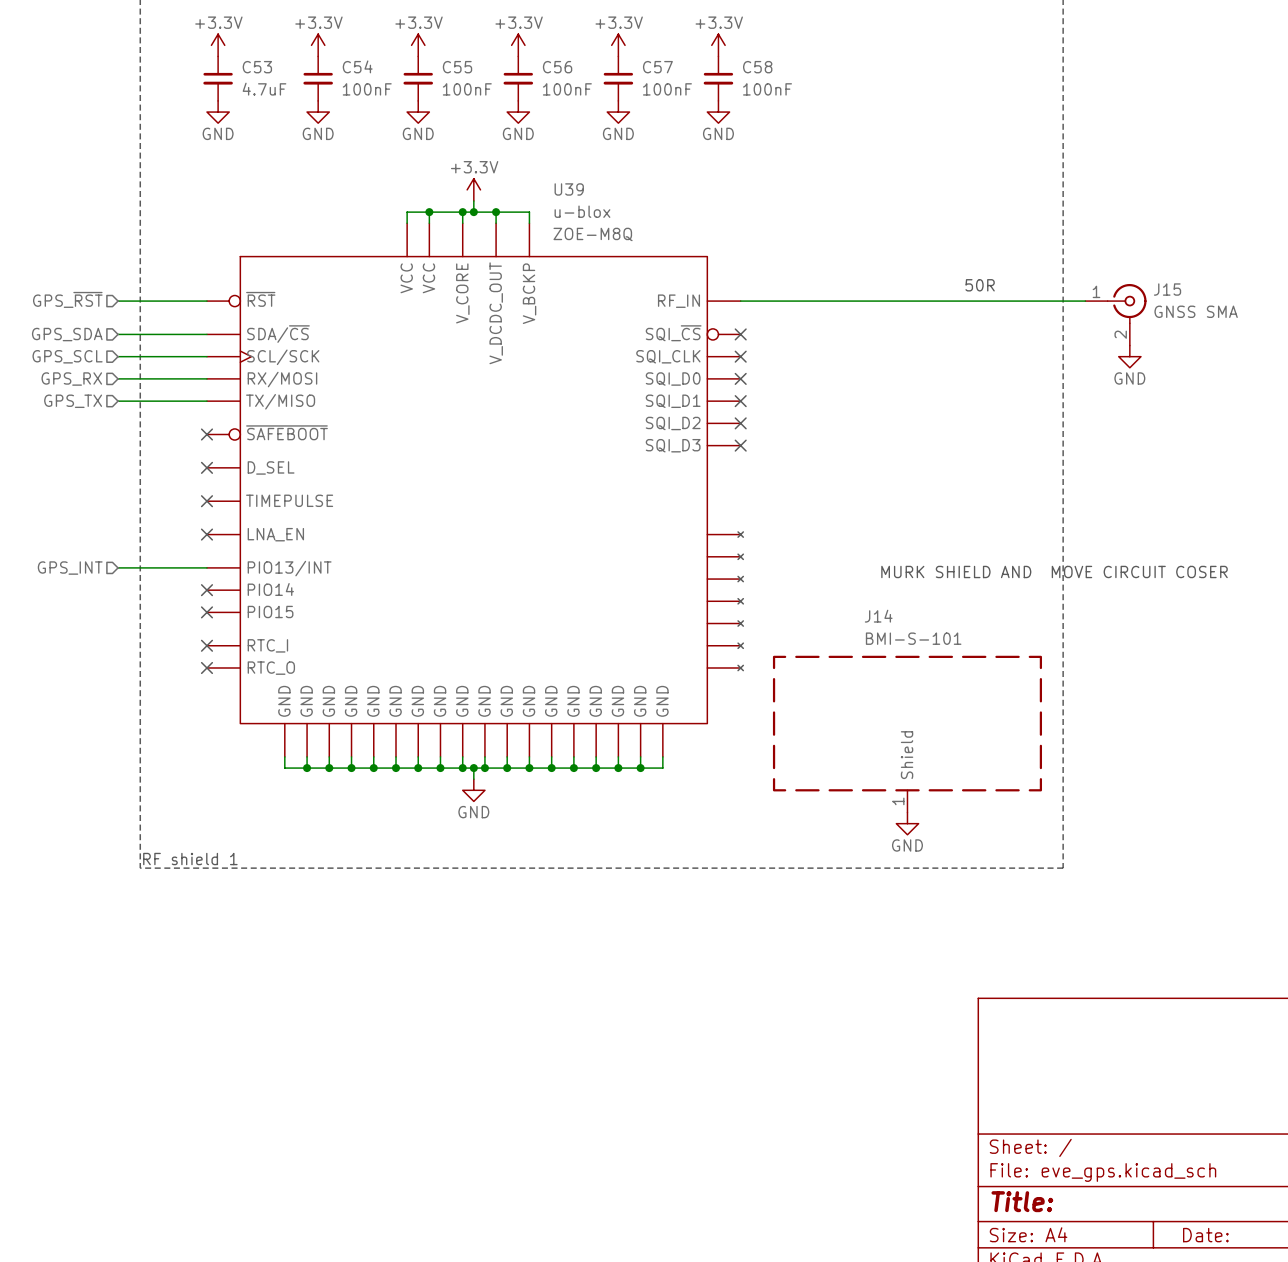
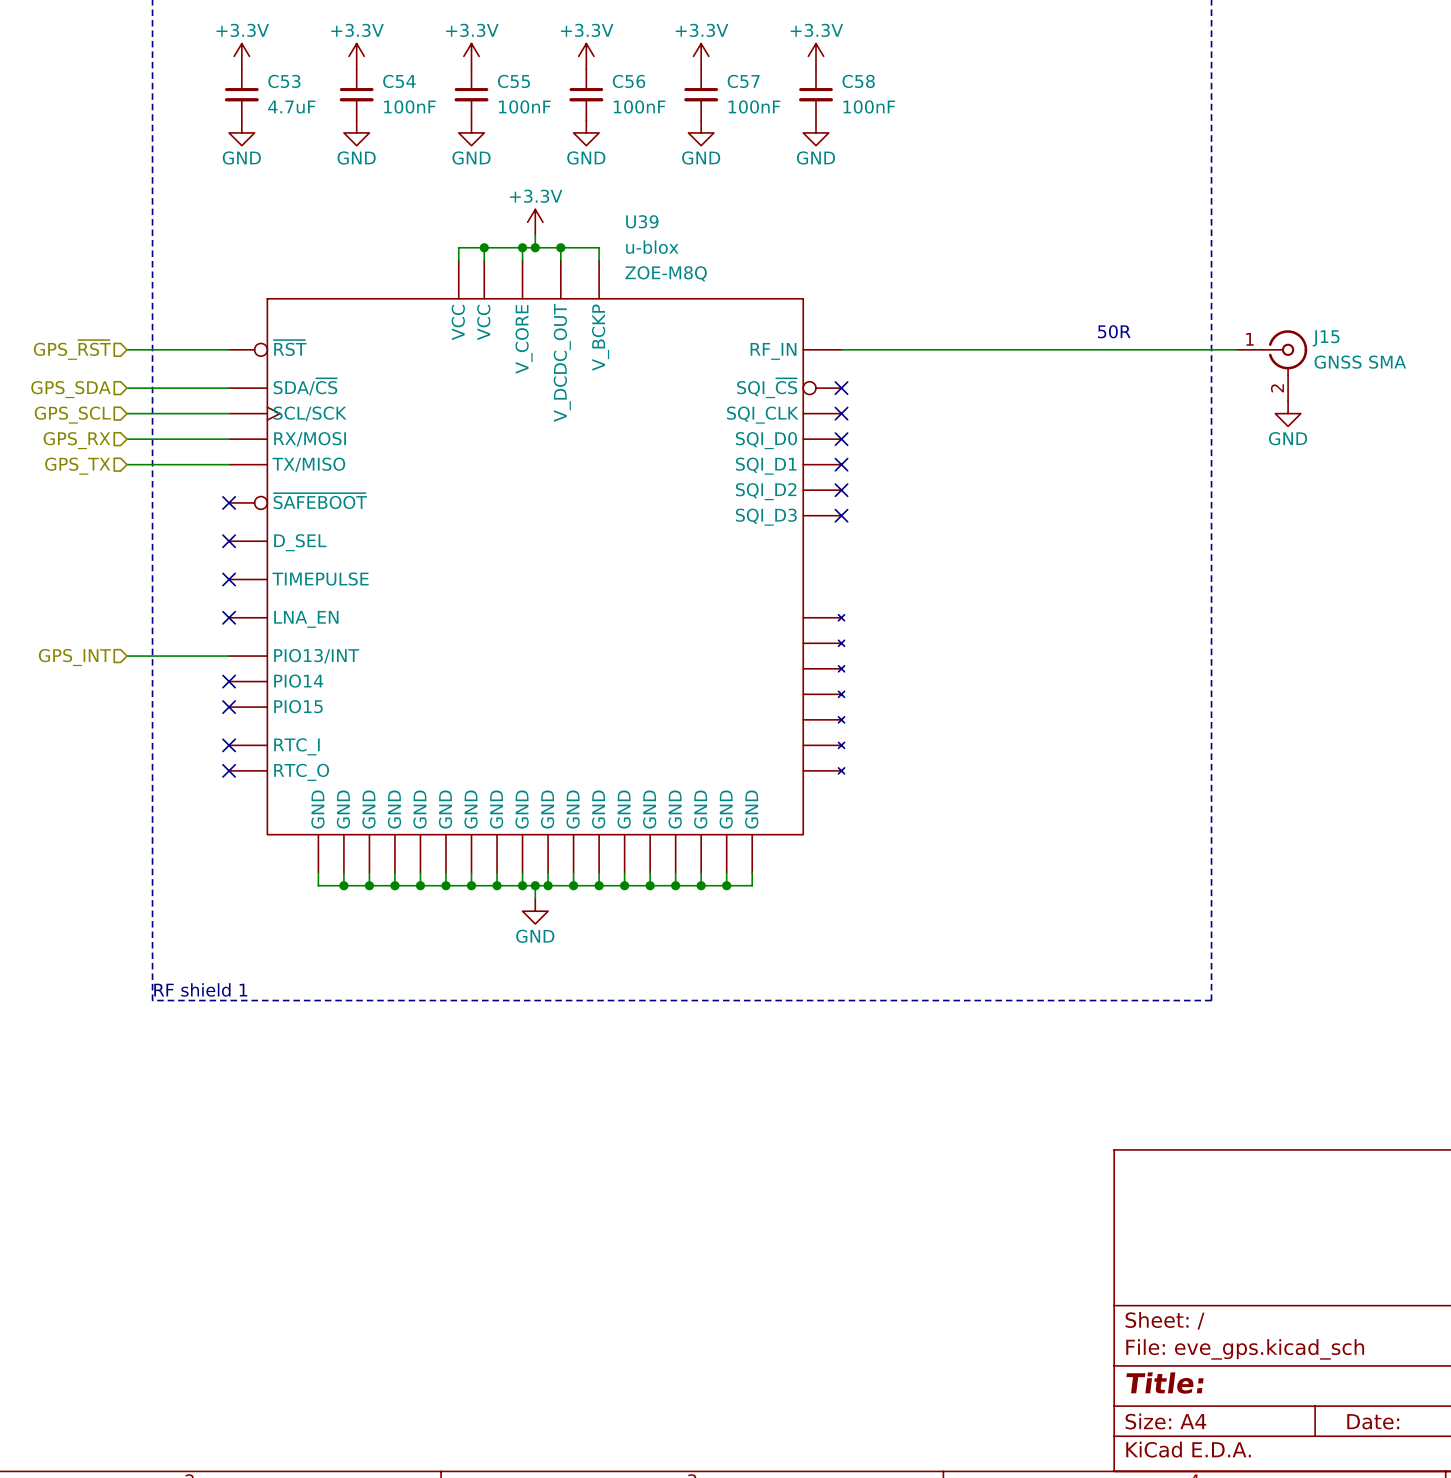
text: MURK SHIELD AND MOVE CIRCUIT COSER (1054, 571) -> none
J14: BMI-S-101 (907, 734) -> none
power symbol: GND (907, 823) -> none

